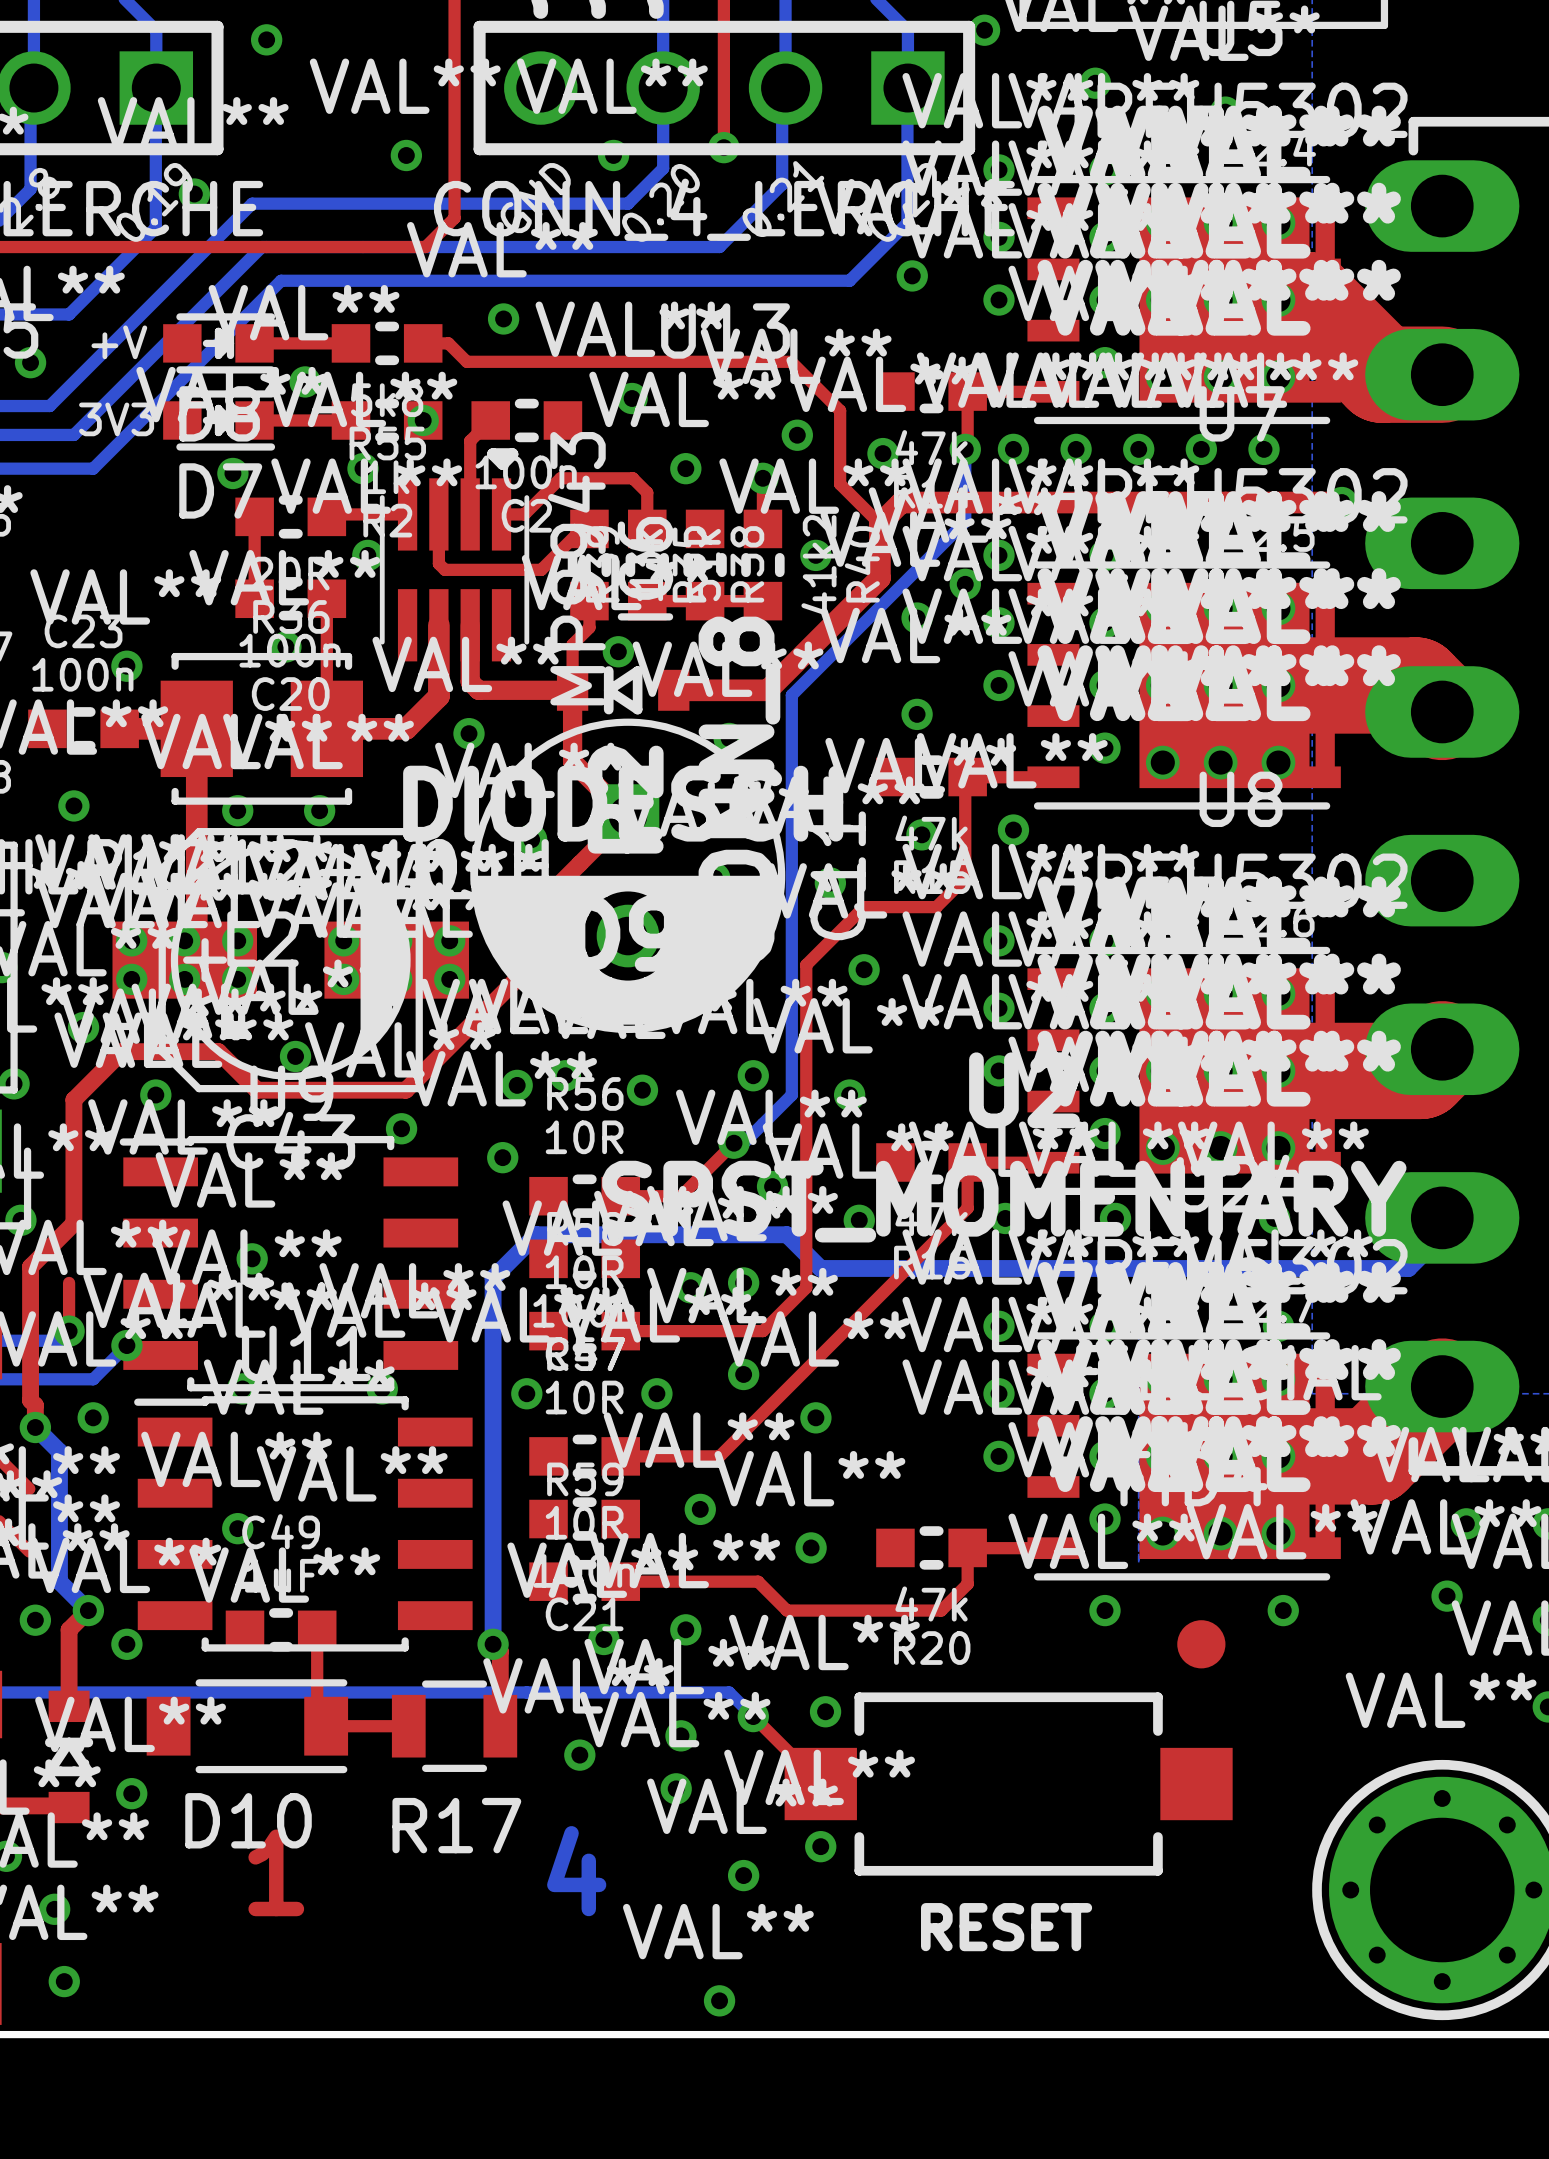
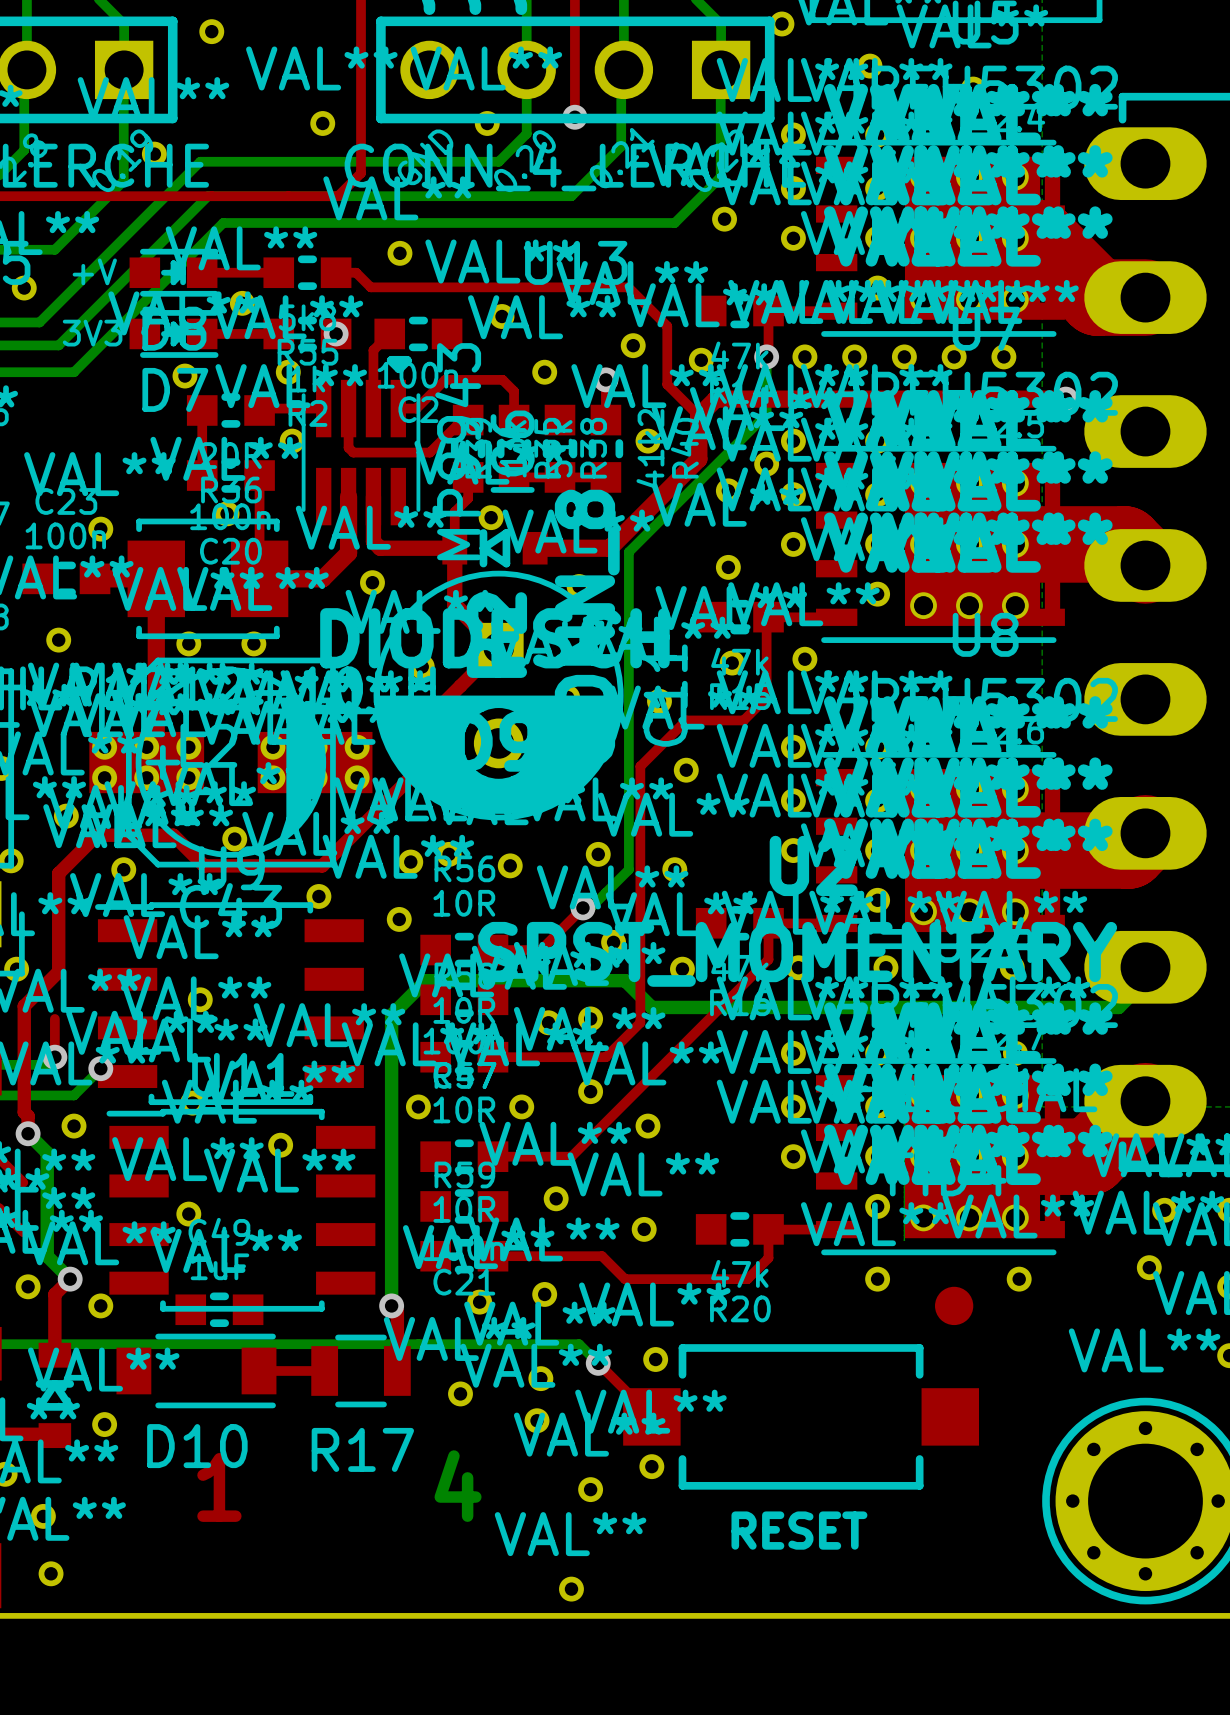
part position: (382, 1388) -> (280, 1145)
C49 position: (281, 1629) -> (219, 1309)
top track: (317, 1629) (317, 1717) -> none

